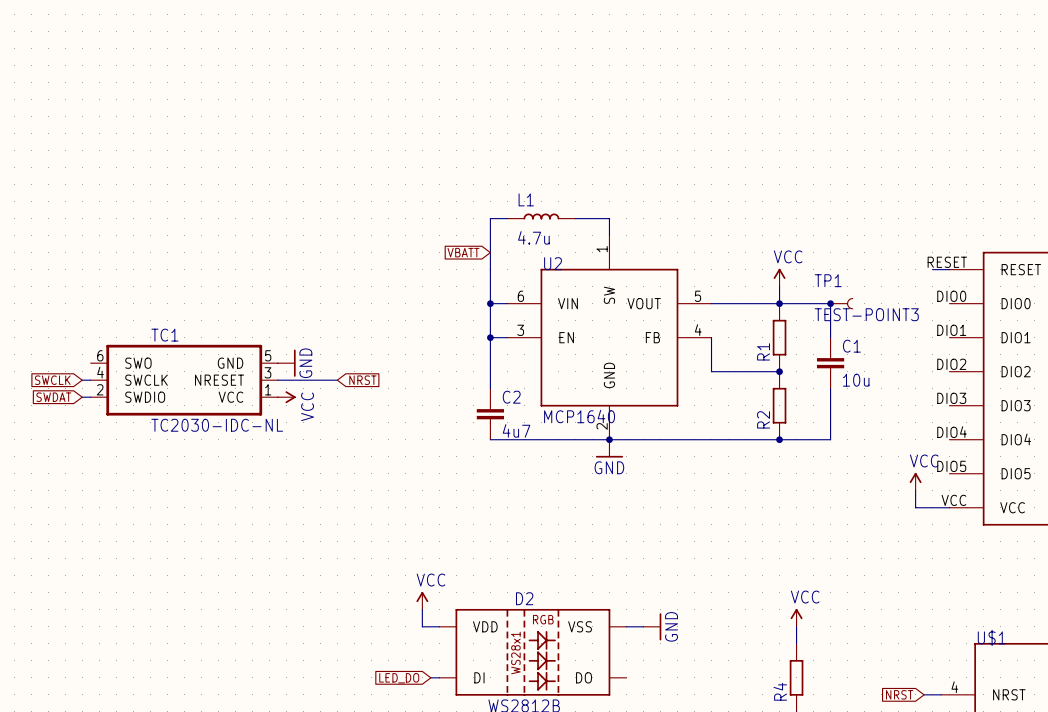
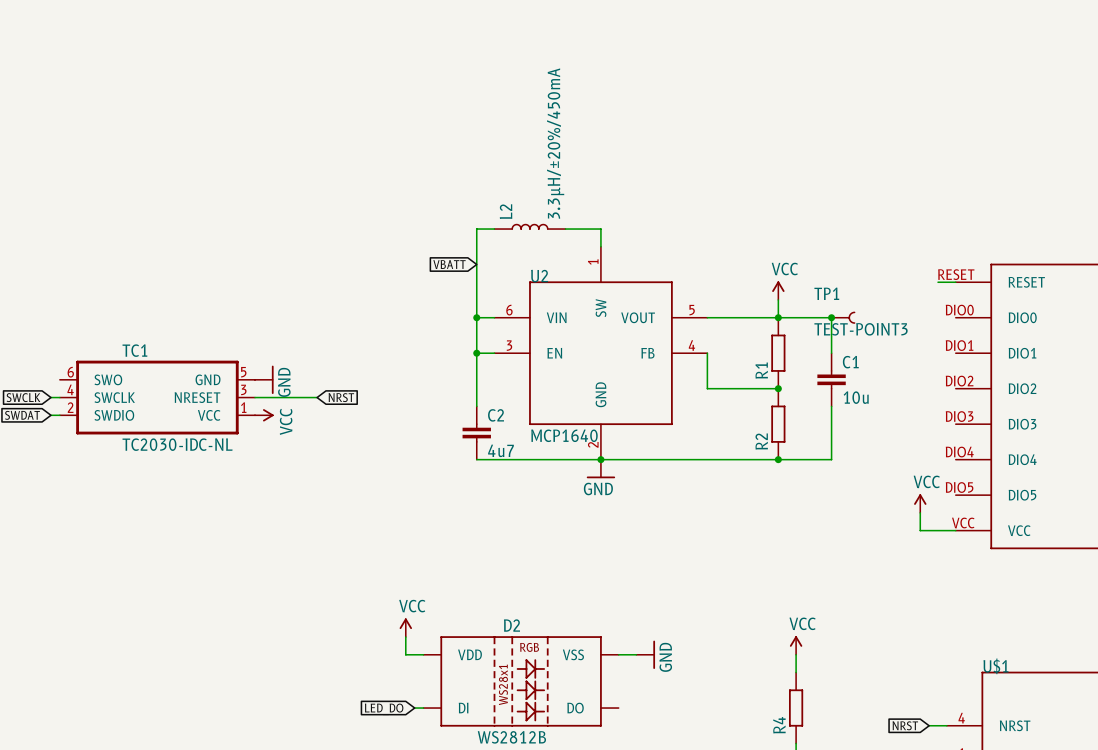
L1: 4.7u (541, 216) -> none
L2: none -> 3.3µH/±20%/450mA (529, 226)

